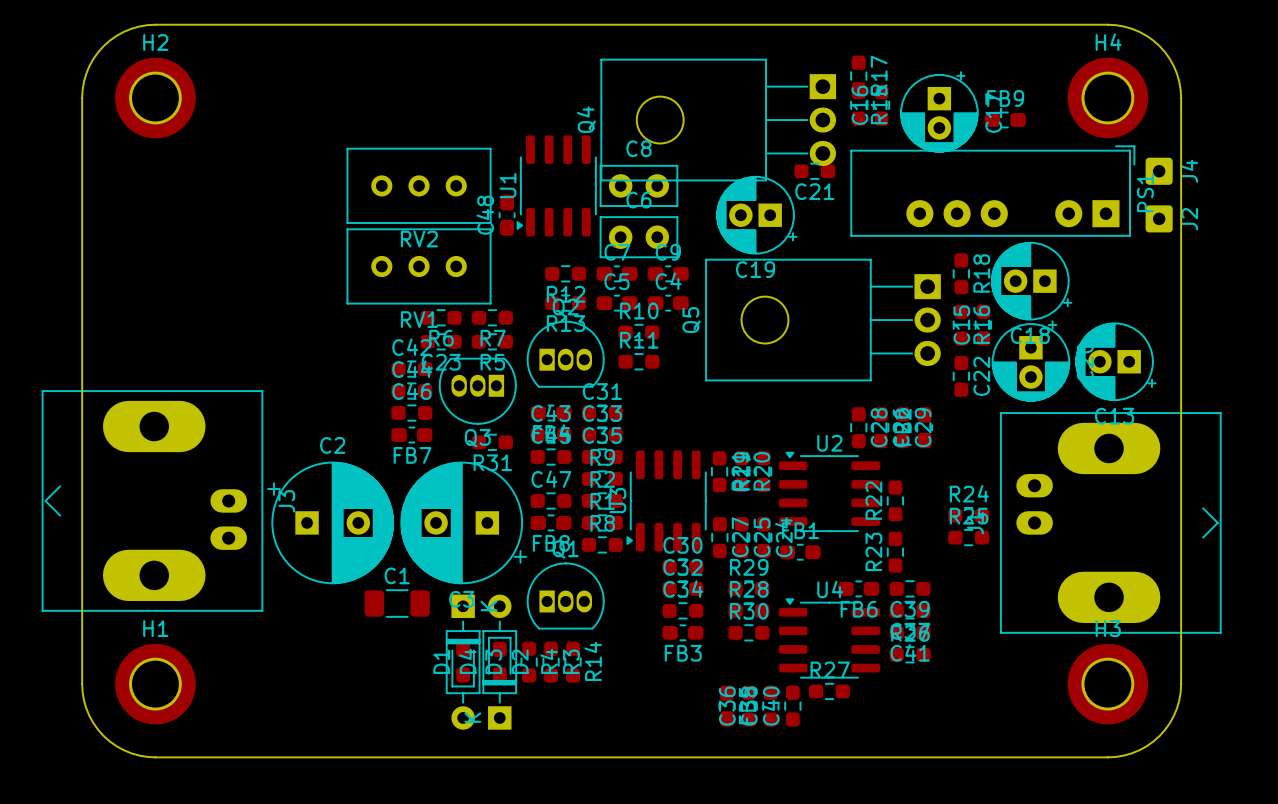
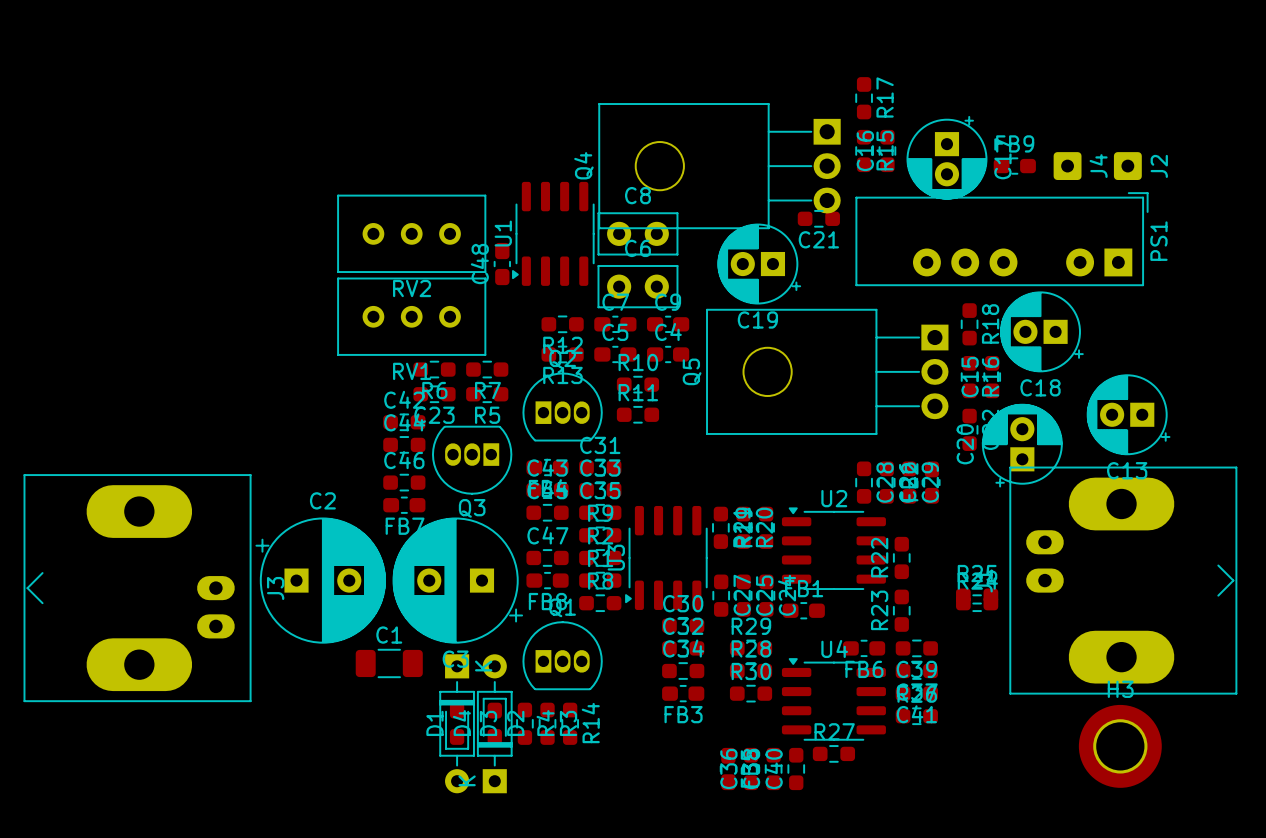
board edge: (155, 24) (1107, 24) (1132, 28) (1146, 35) (1159, 46) (1169, 59) (1177, 73) (1181, 98) (1181, 684) (1177, 708) (1169, 723) (1159, 735) (1146, 746) (1132, 753) (1107, 757) (155, 757) (131, 753) (116, 746) (103, 735) (93, 723) (86, 708) (82, 684) (82, 98) (86, 73) (93, 59) (103, 46) (116, 35) (131, 28) (155, 24) -> none
R17 position: (858, 76) -> (864, 98)
H2: (155, 98) -> none
H4: (1107, 98) -> none
J4 position: (1159, 171) -> (1067, 166)
J2 position: (1159, 218) -> (1127, 166)
C20 rotation: 0° (1030, 361) -> 180° (1022, 445)
Q3 position: (477, 391) -> (472, 460)
C46 position: (411, 413) -> (404, 482)
FB7 position: (411, 435) -> (404, 505)
R31: (492, 442) -> none
J3 position: (152, 500) -> (137, 588)
R24 position: (968, 515) -> (977, 603)
H1: (155, 684) -> none

